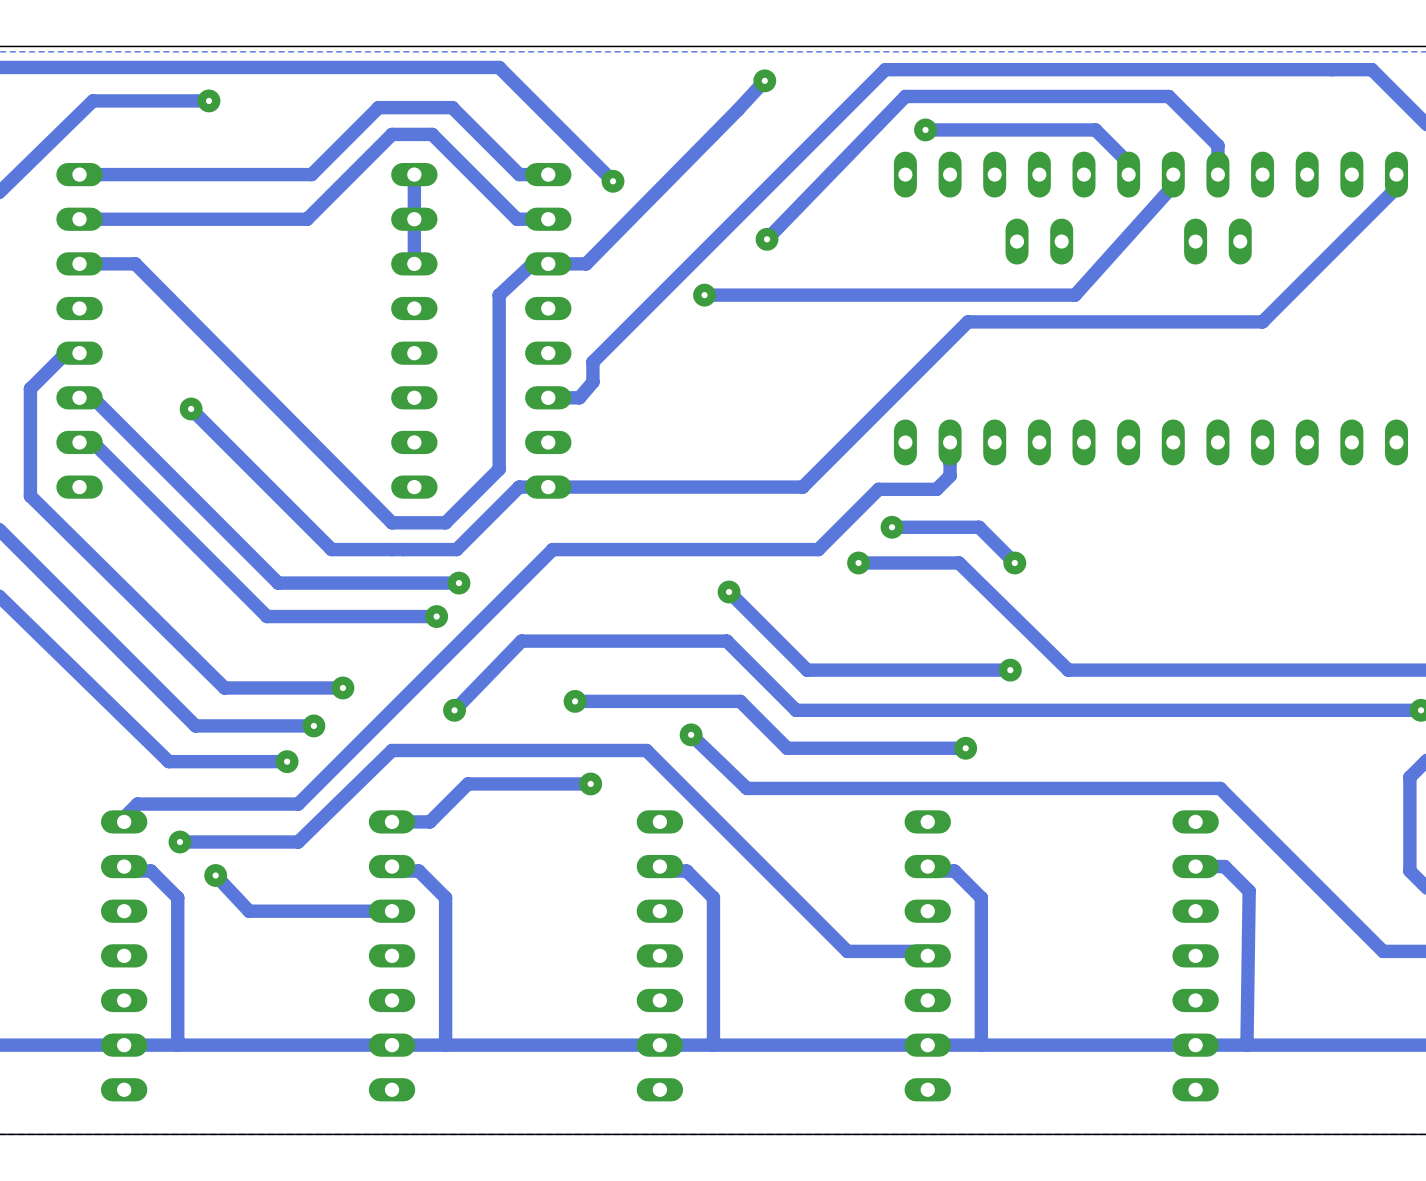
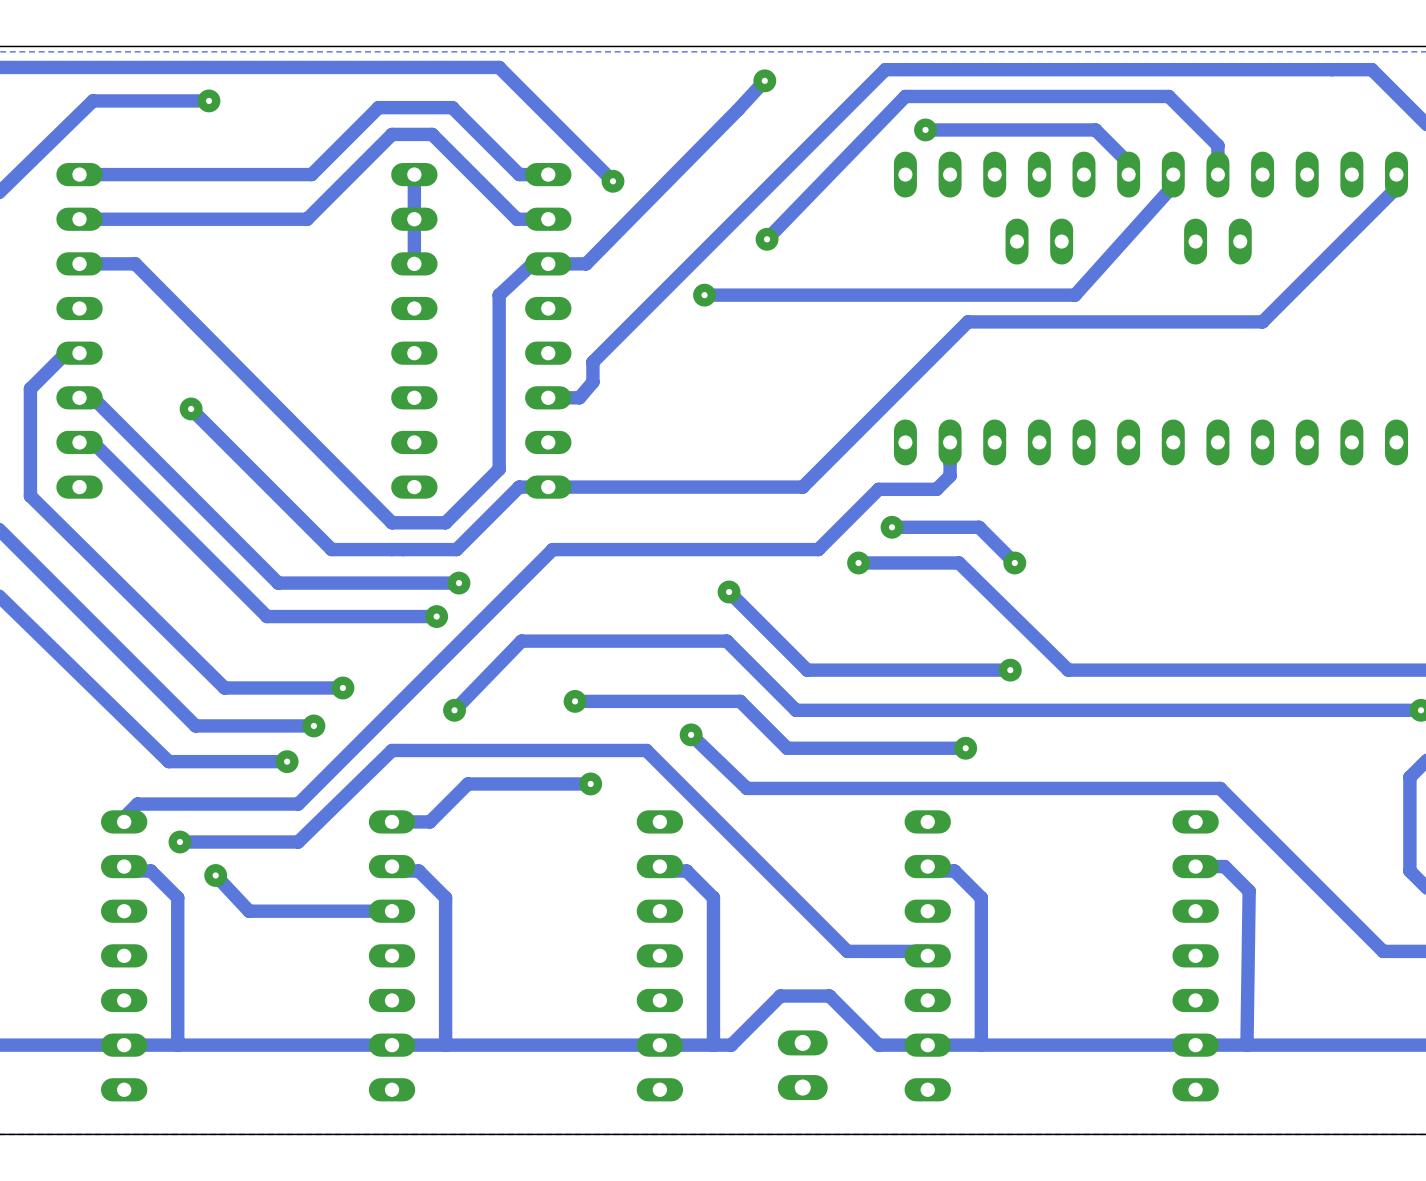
track: (878, 1045) (731, 1045) -> (878, 1045) (829, 996) (780, 996) (731, 1045)
part: none -> (802, 1065)

